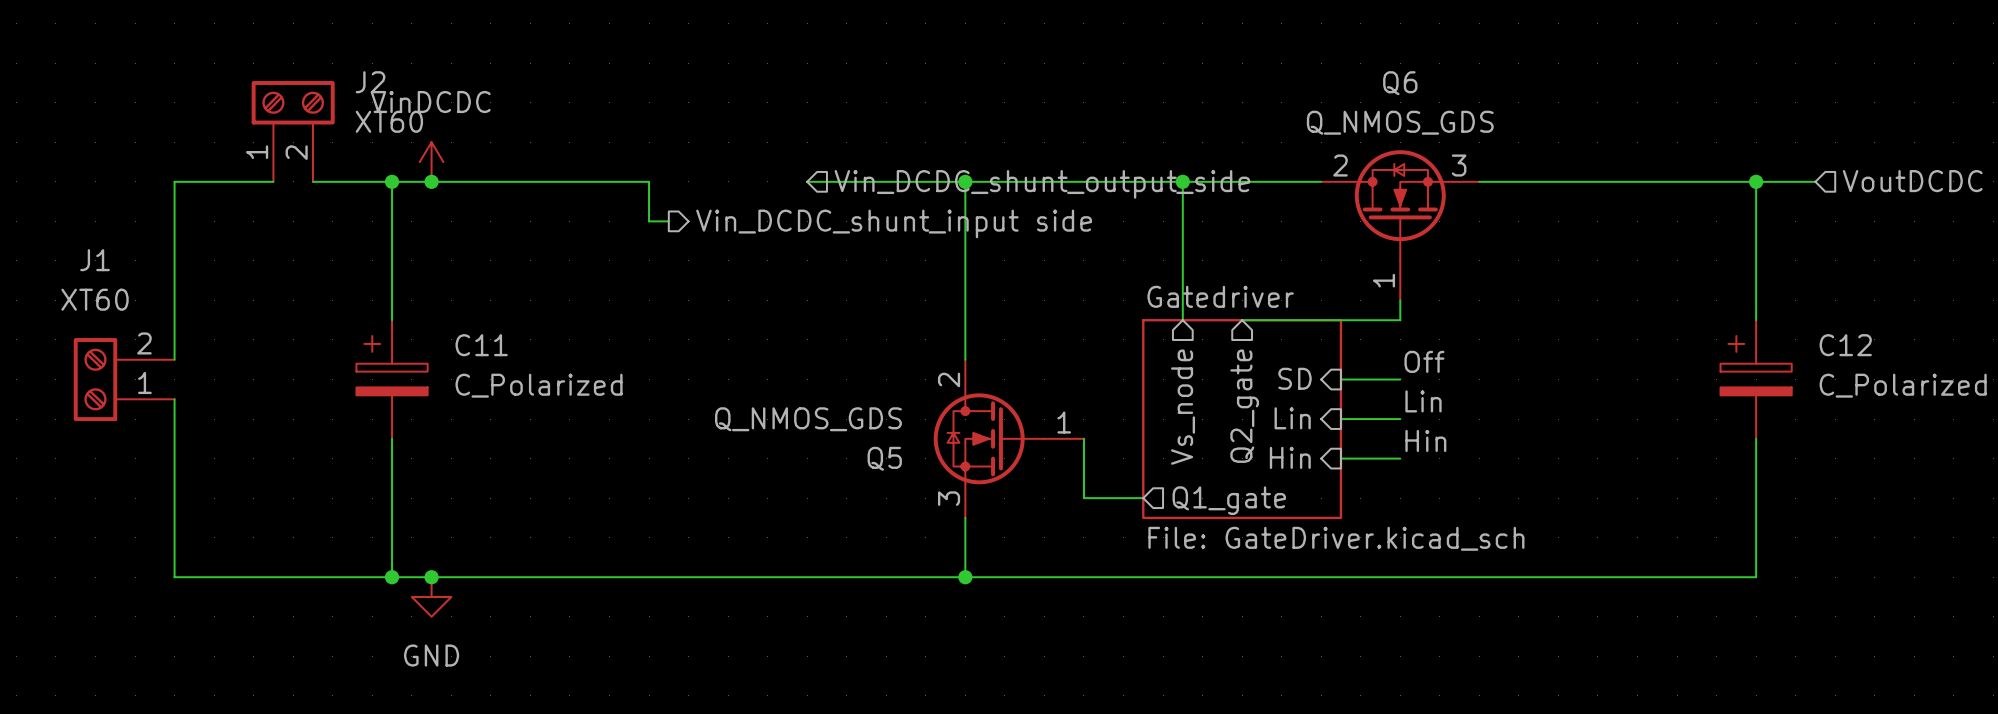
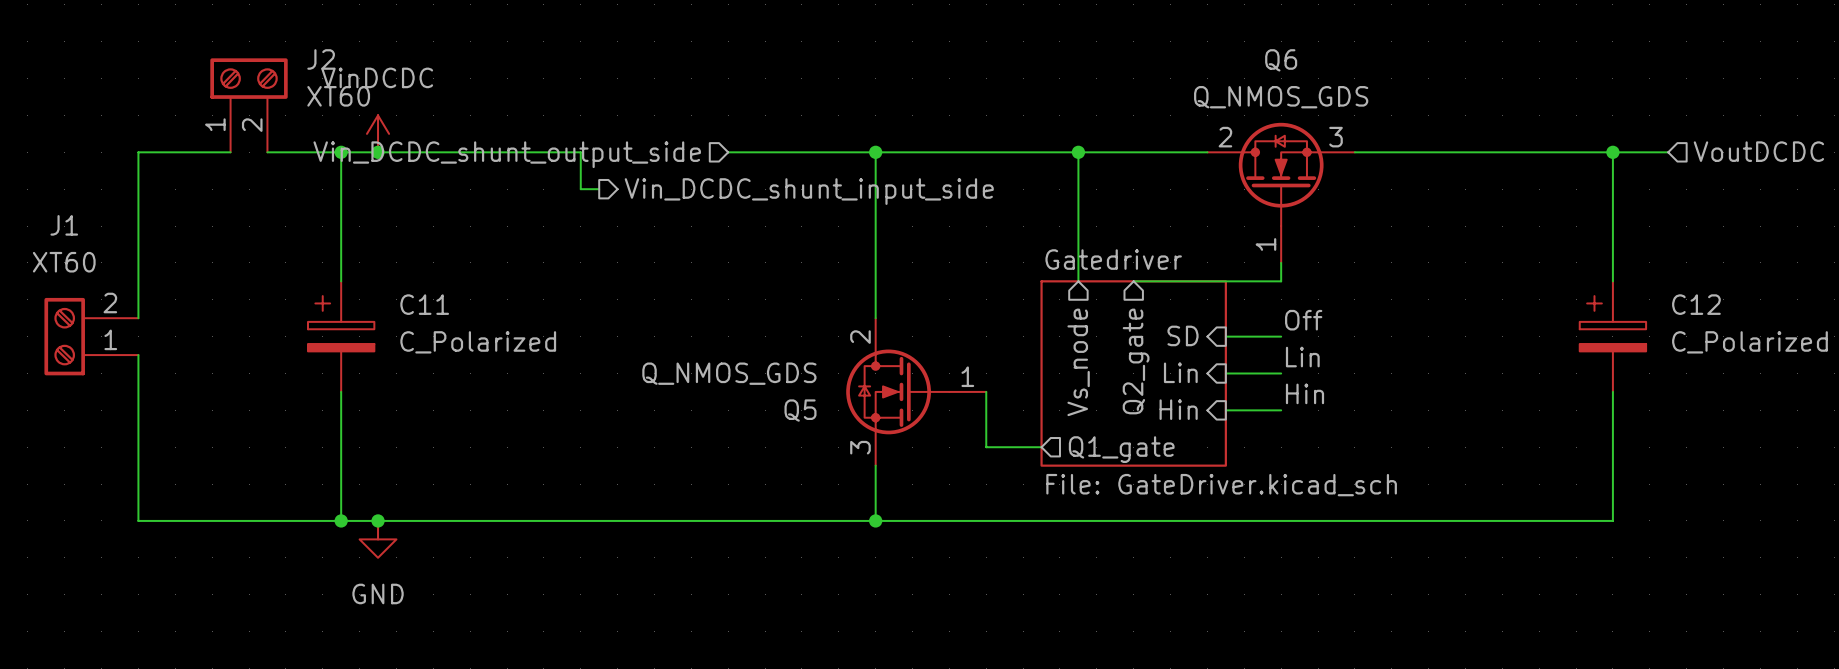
hierarchical label rotation: 0° (1042, 184) -> 180° (507, 154)
hierarchical label position: Vin_DCDC_shunt_output_side (1042, 184) -> Vin_DCDC_shunt_output_side (507, 154)
hierarchical label: Vin_DCDC_shunt_input side (894, 223) -> Vin_DCDC_shunt_input_side (809, 191)

